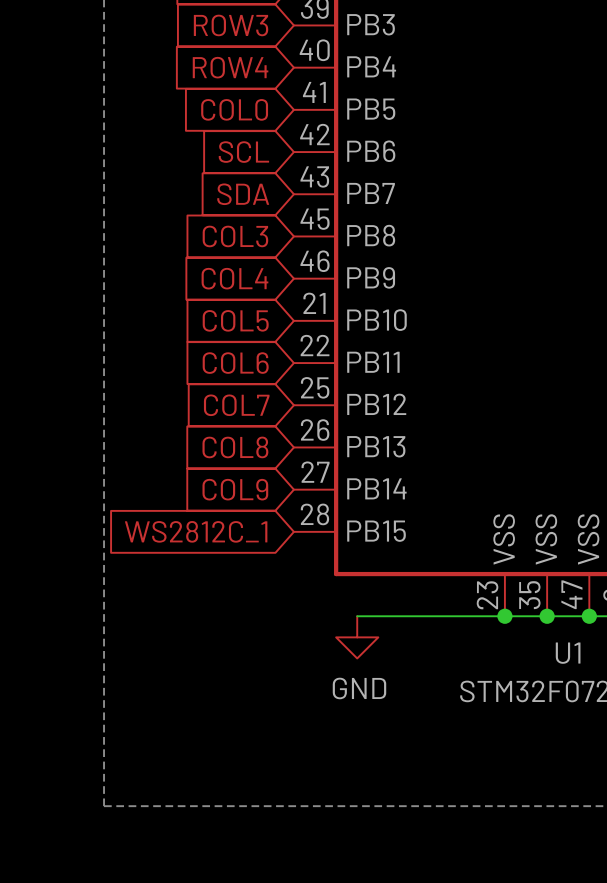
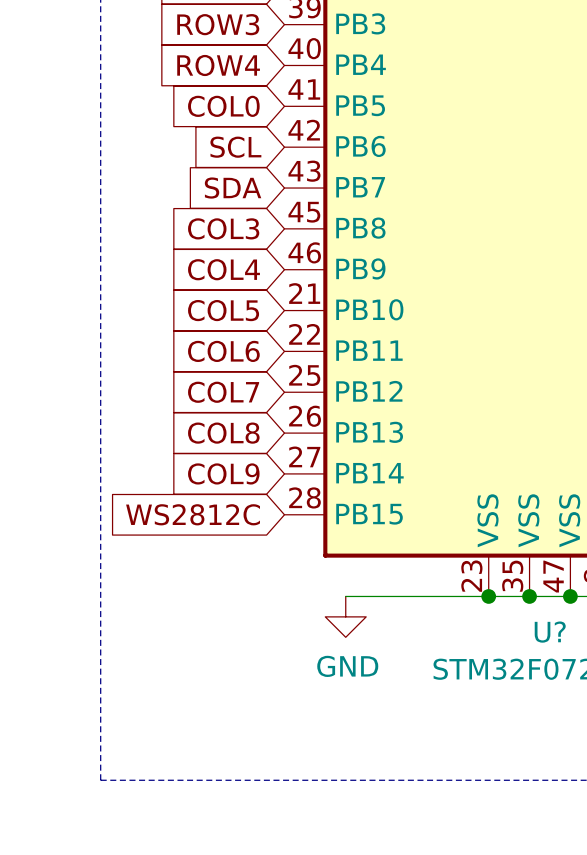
global label: WS2812C_1 (196, 531) -> WS2812C (193, 514)
U1 name: U1 (568, 653) -> U? (550, 632)

